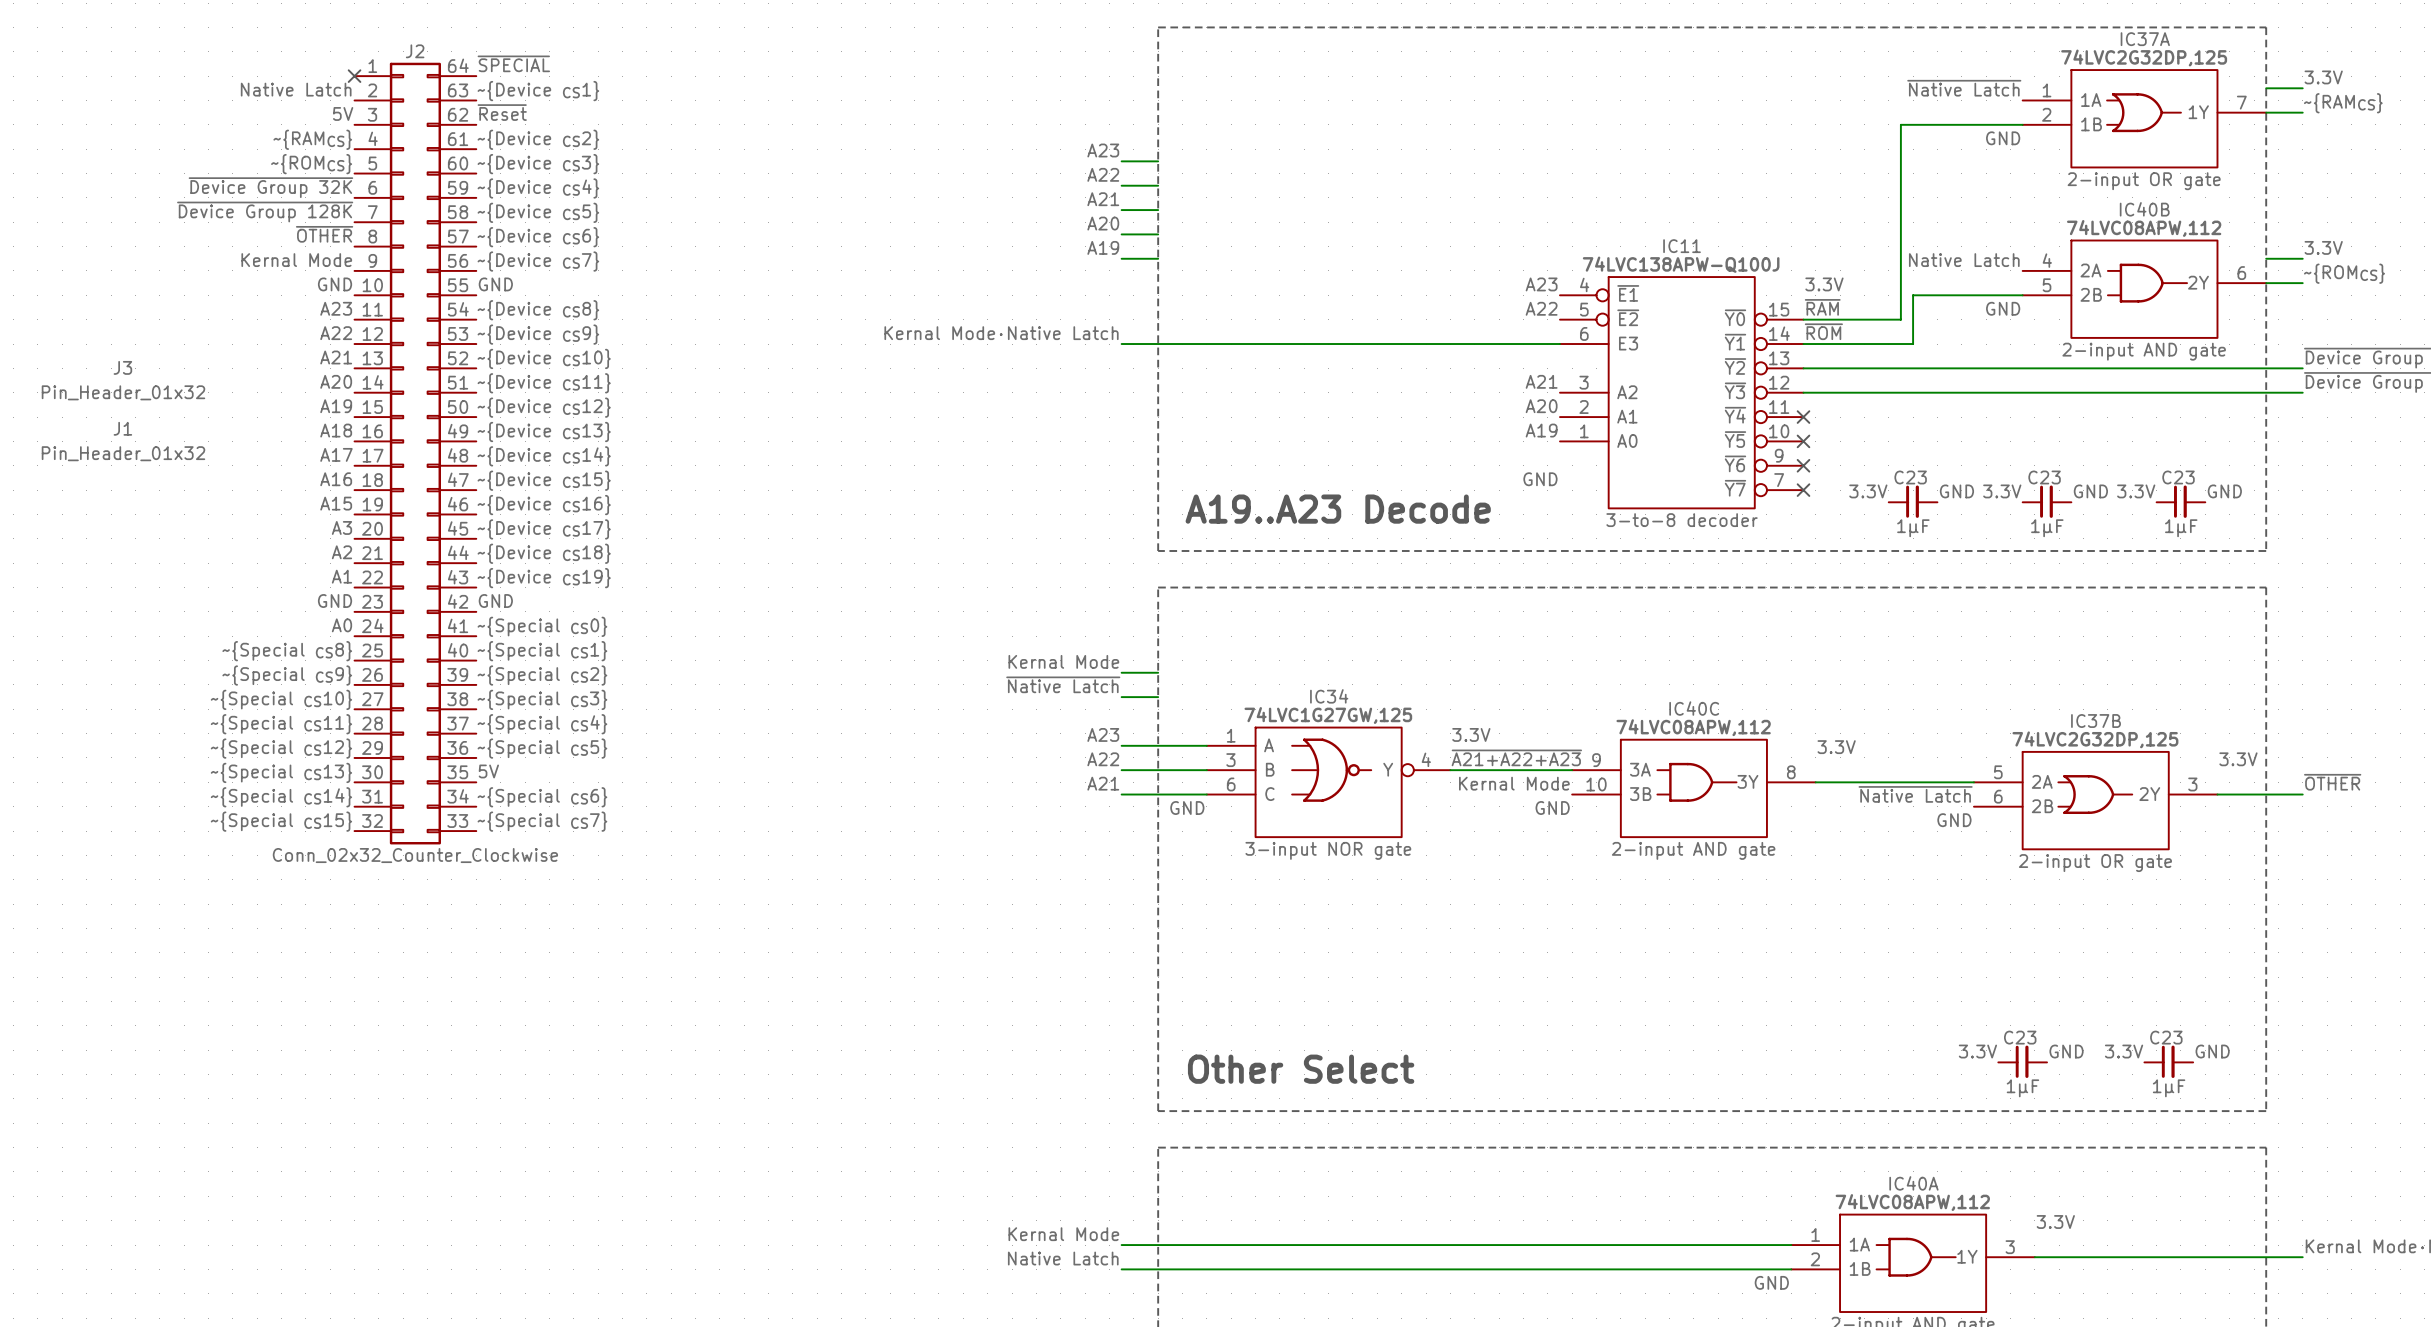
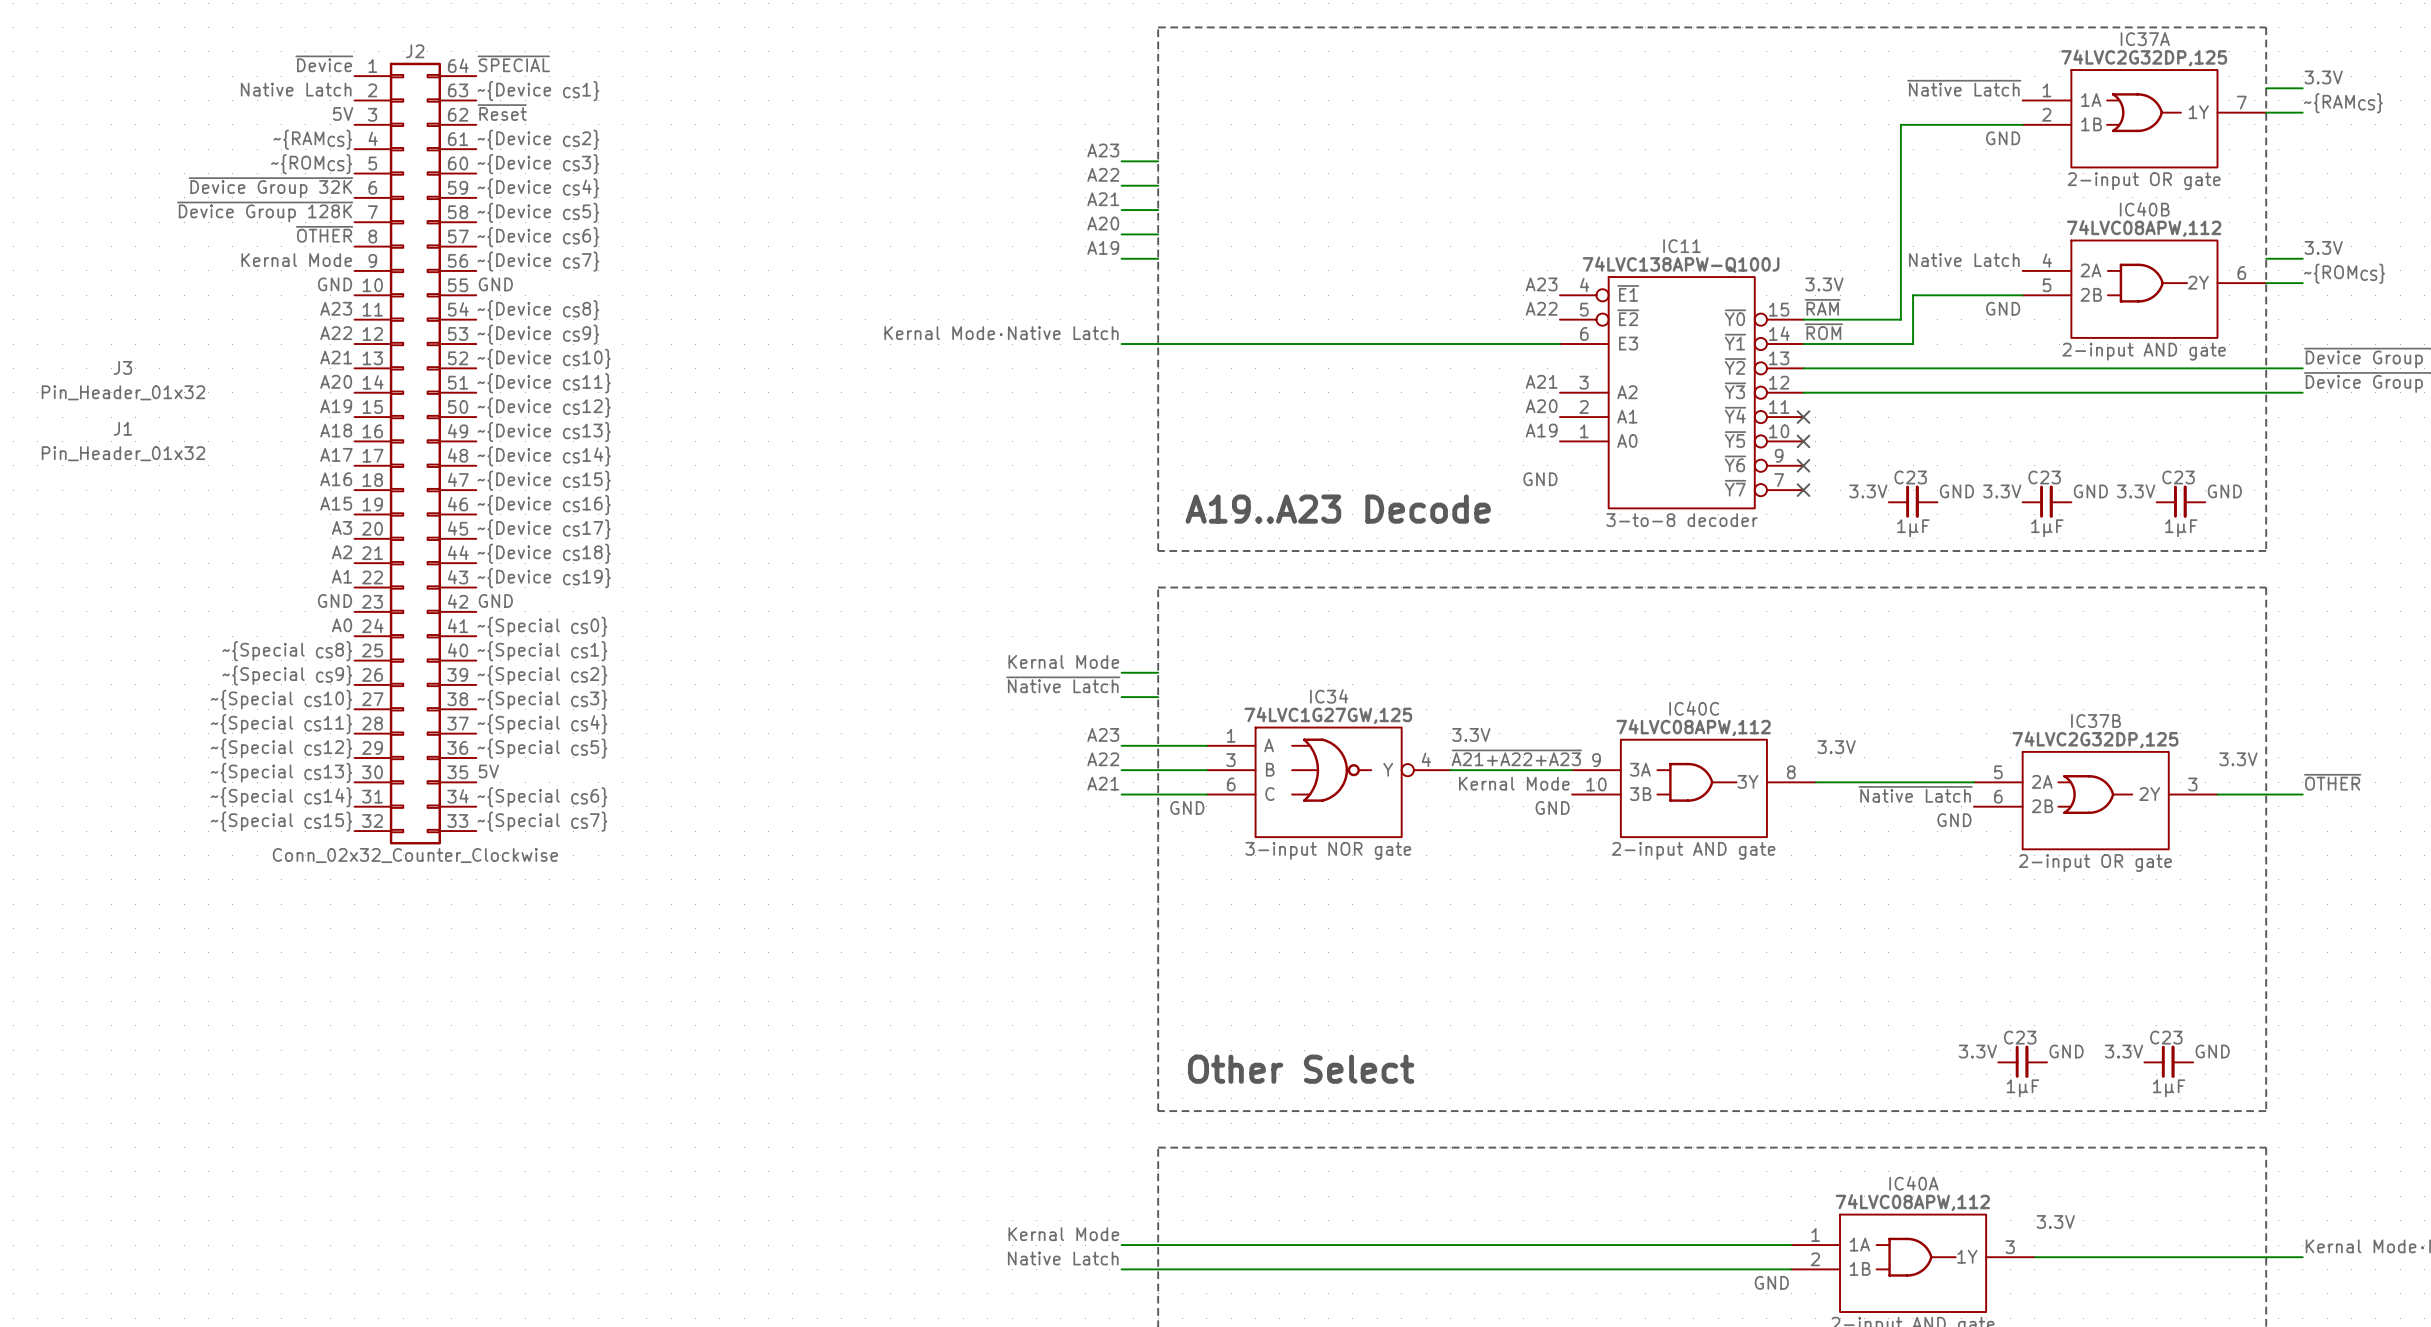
label: none -> ~{Device} (324, 63)
no-connect mark: (354, 76) -> none

